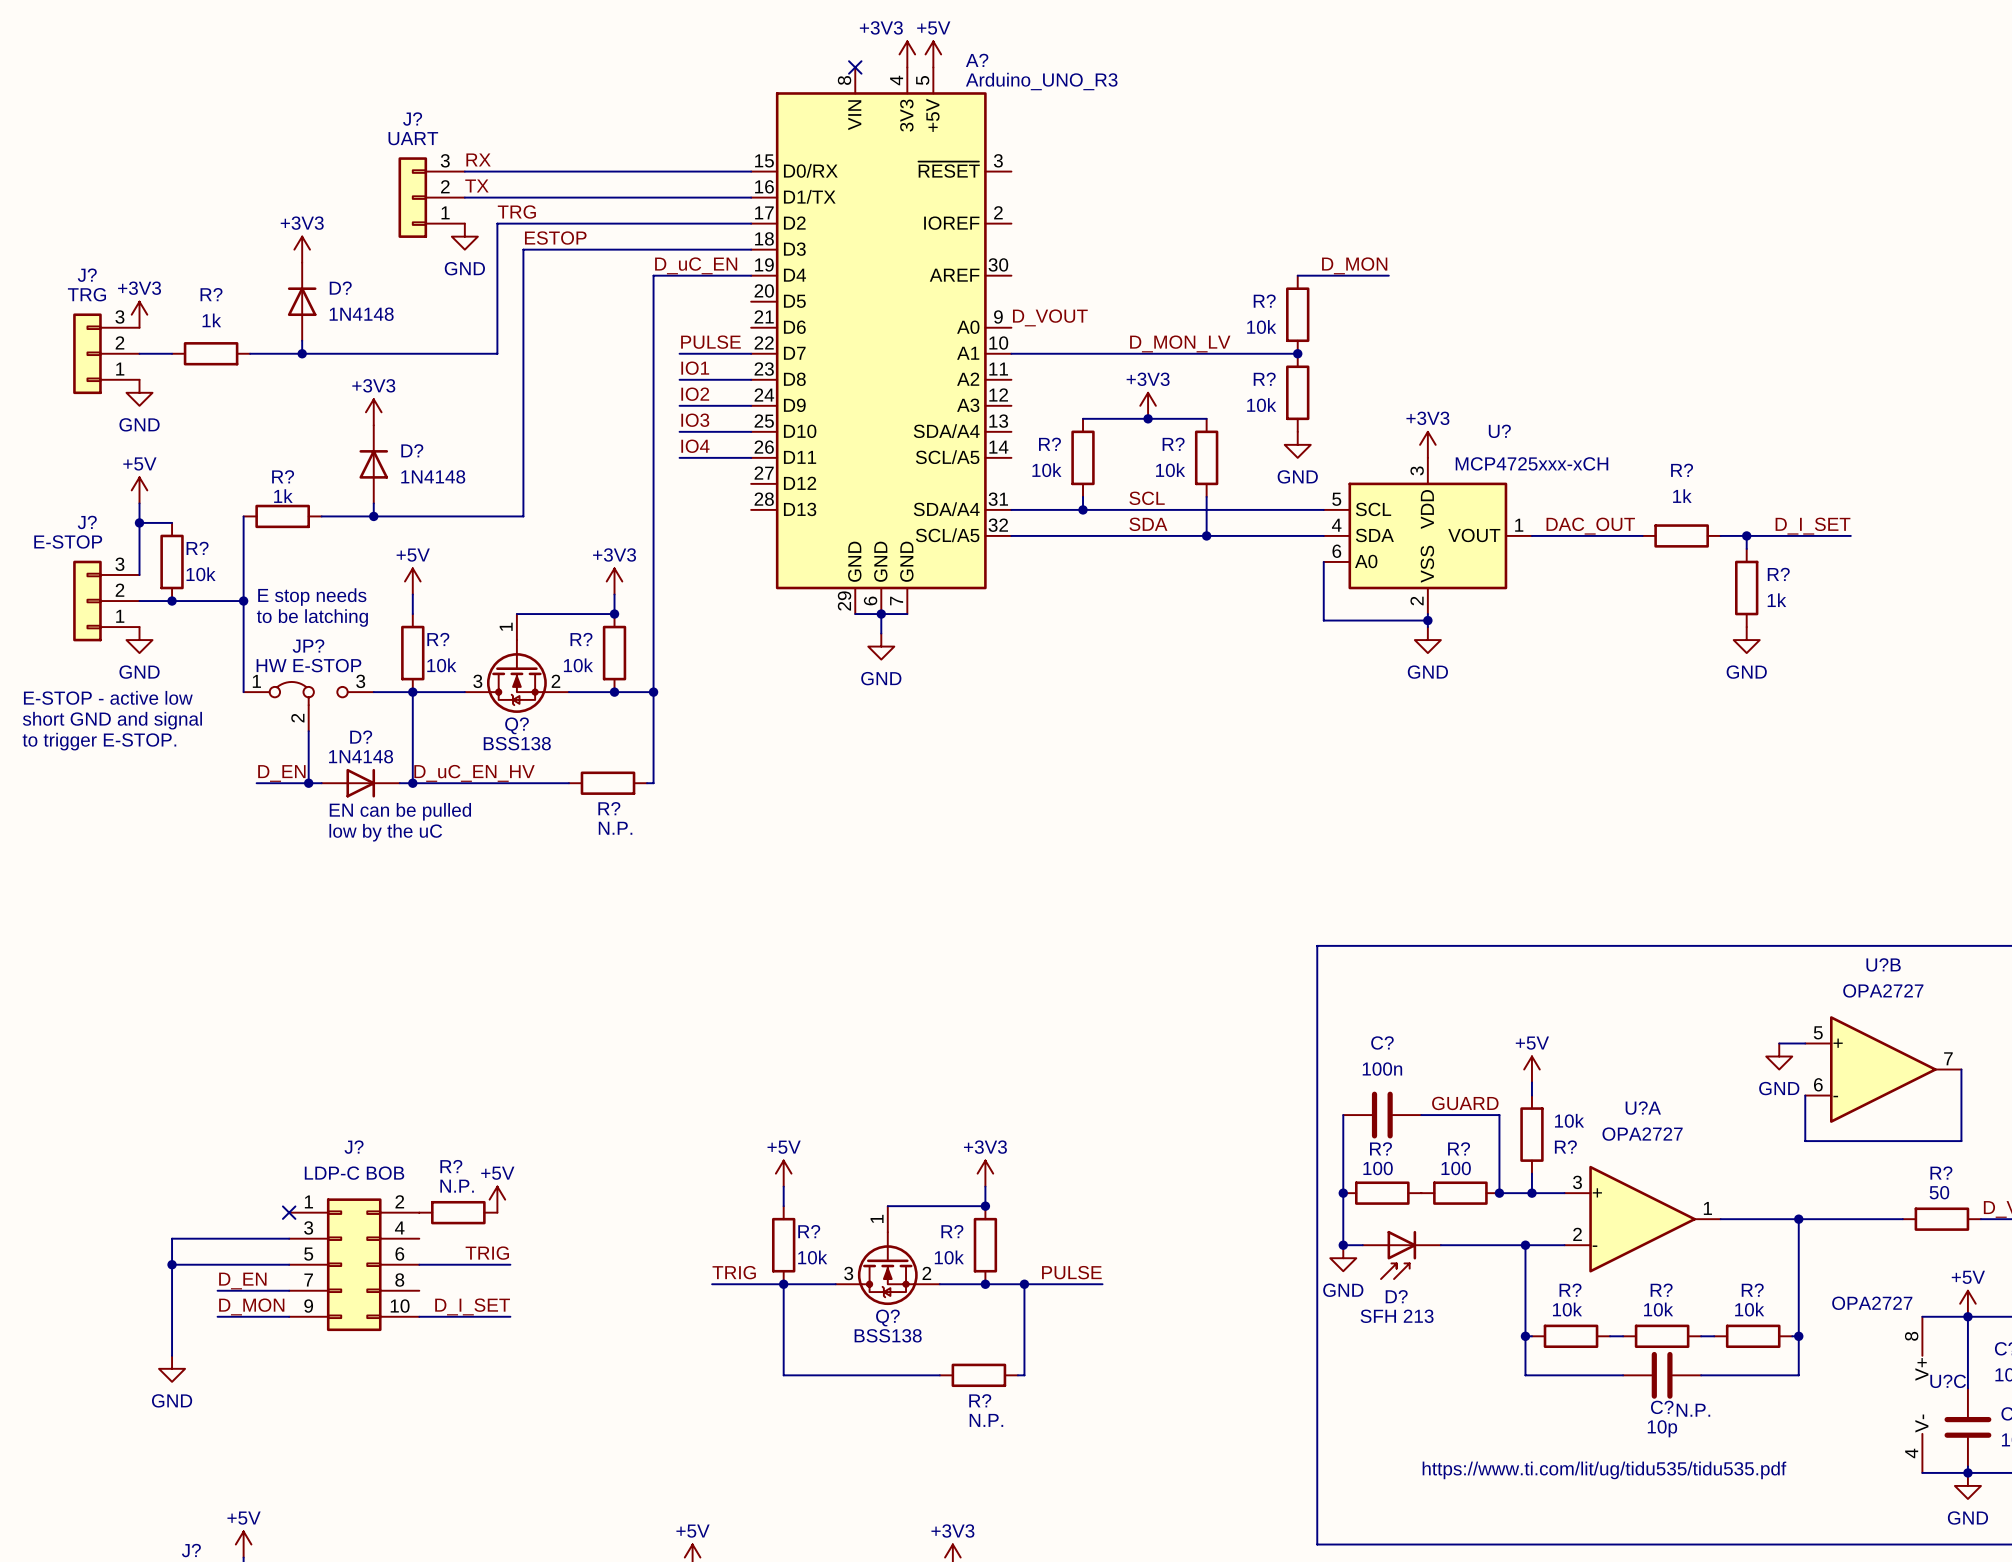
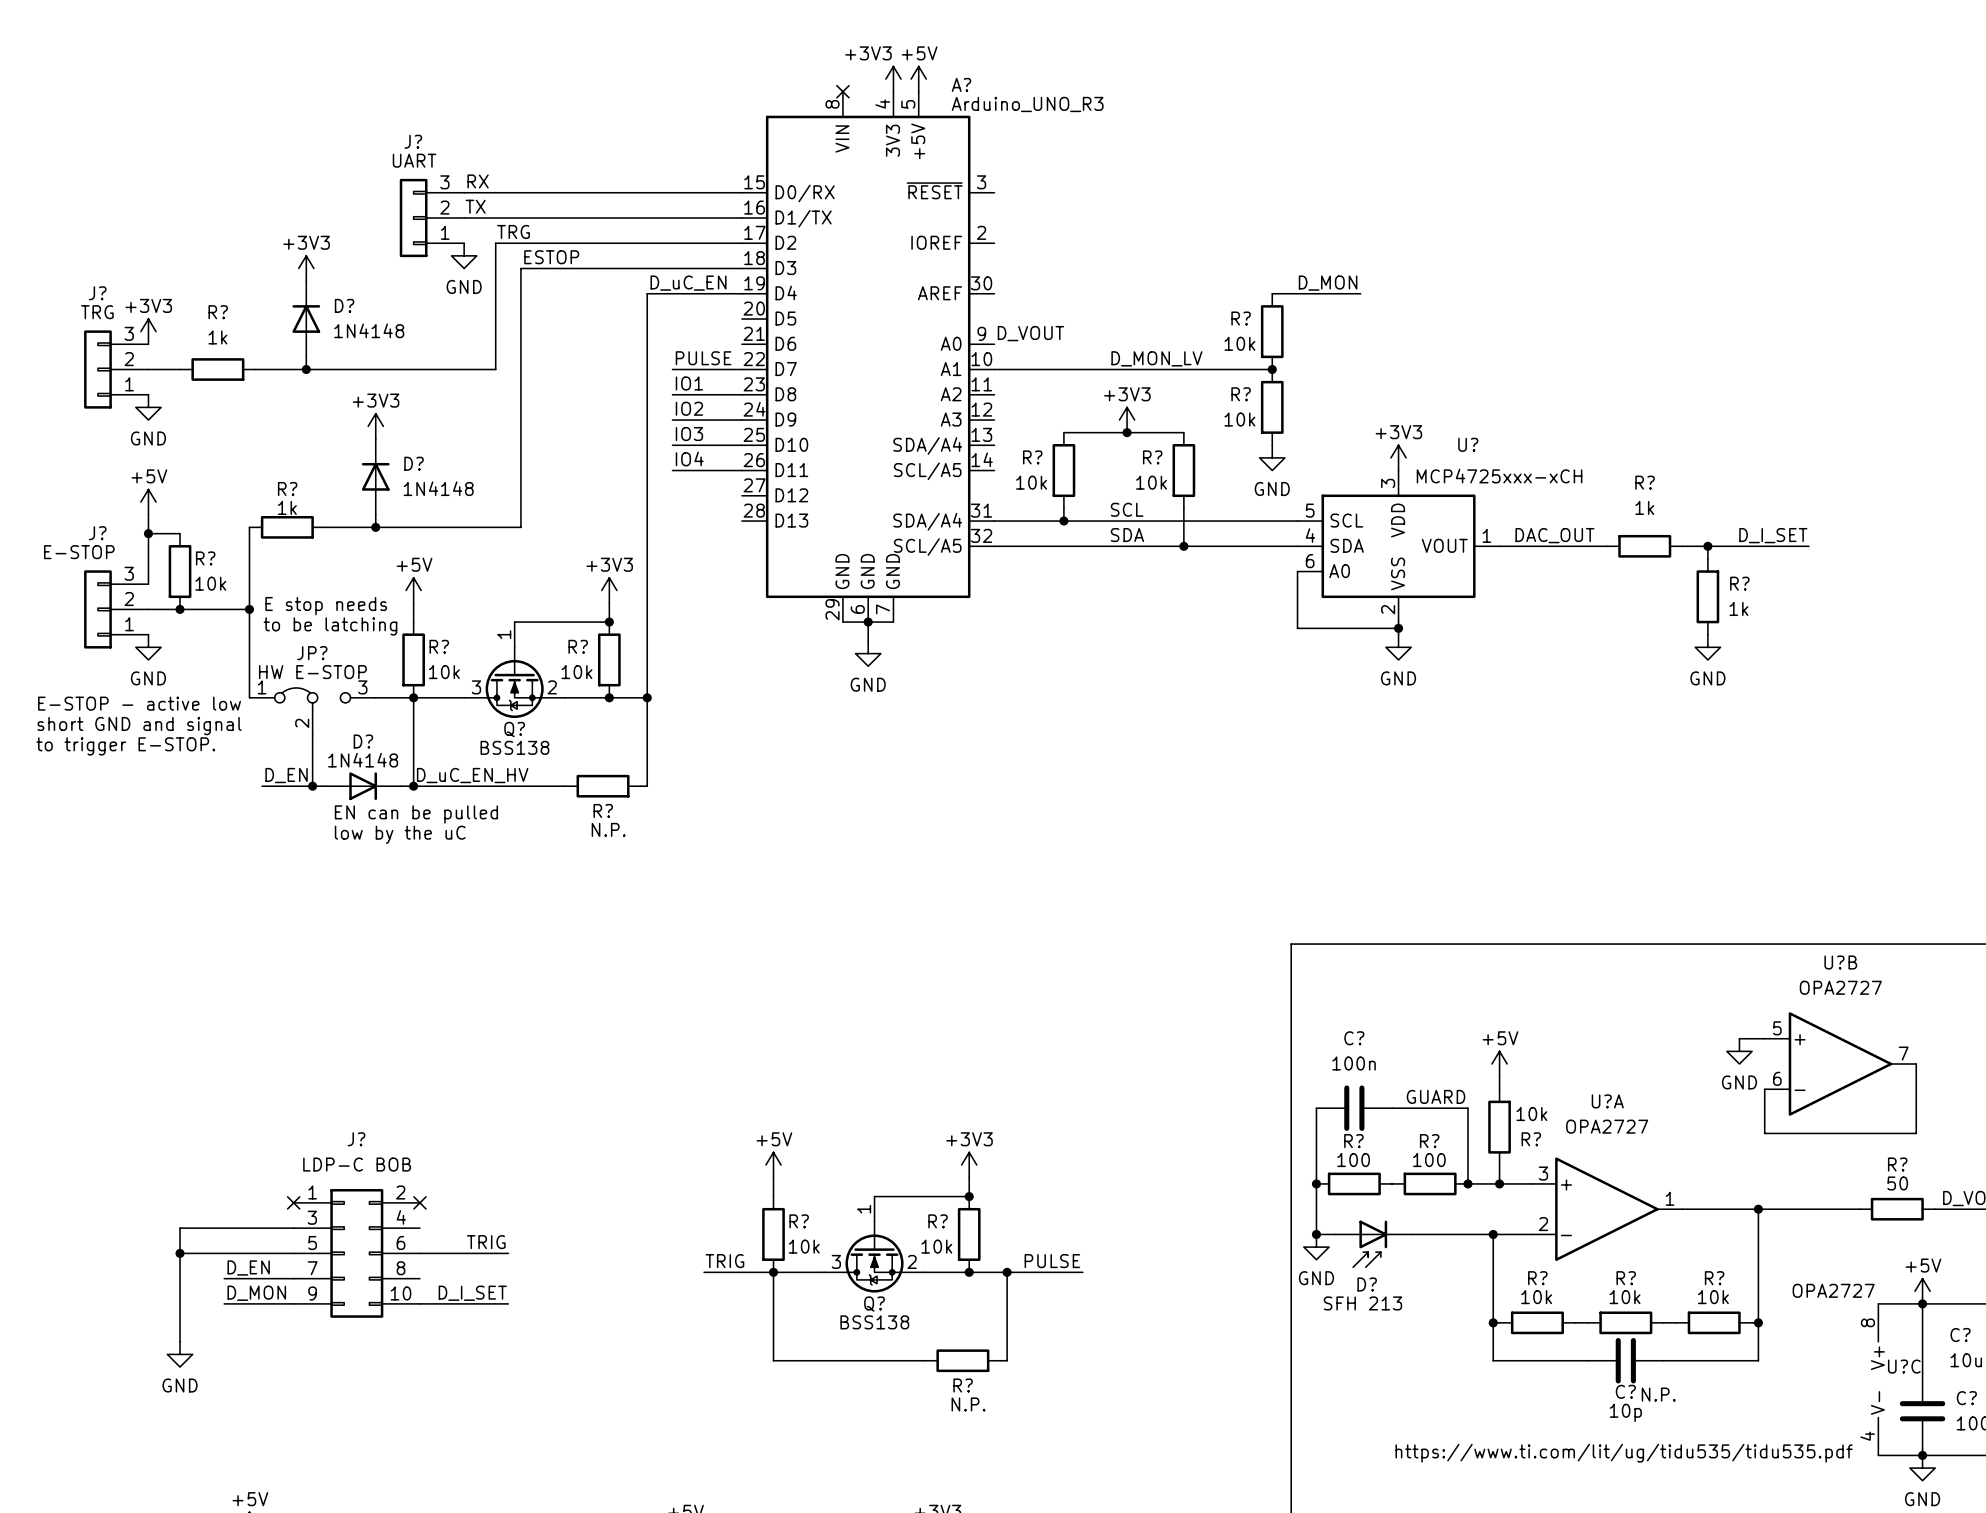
power symbol: +5V (497, 1199) -> none
no-connect mark: none -> (419, 1202)
R?: N.P. (458, 1212) -> none

